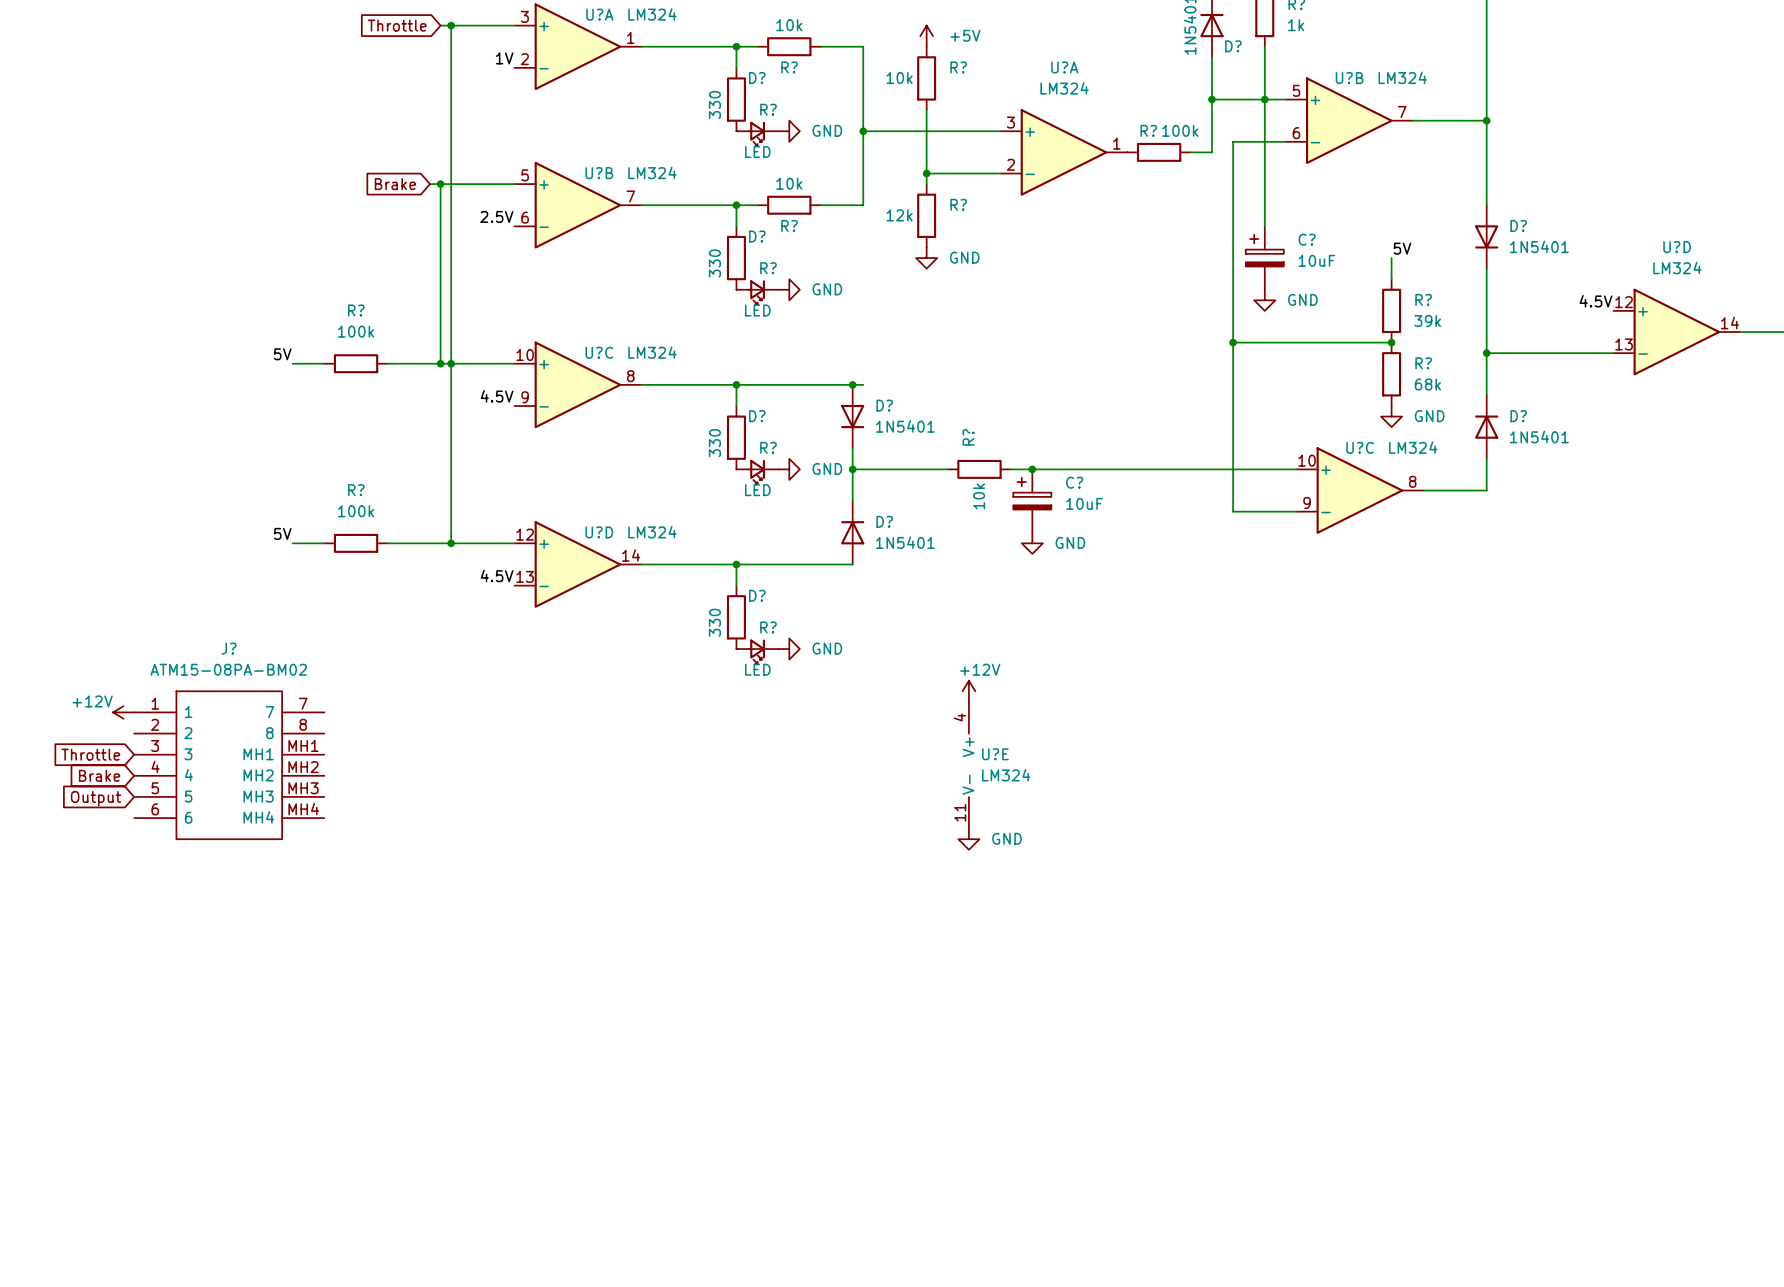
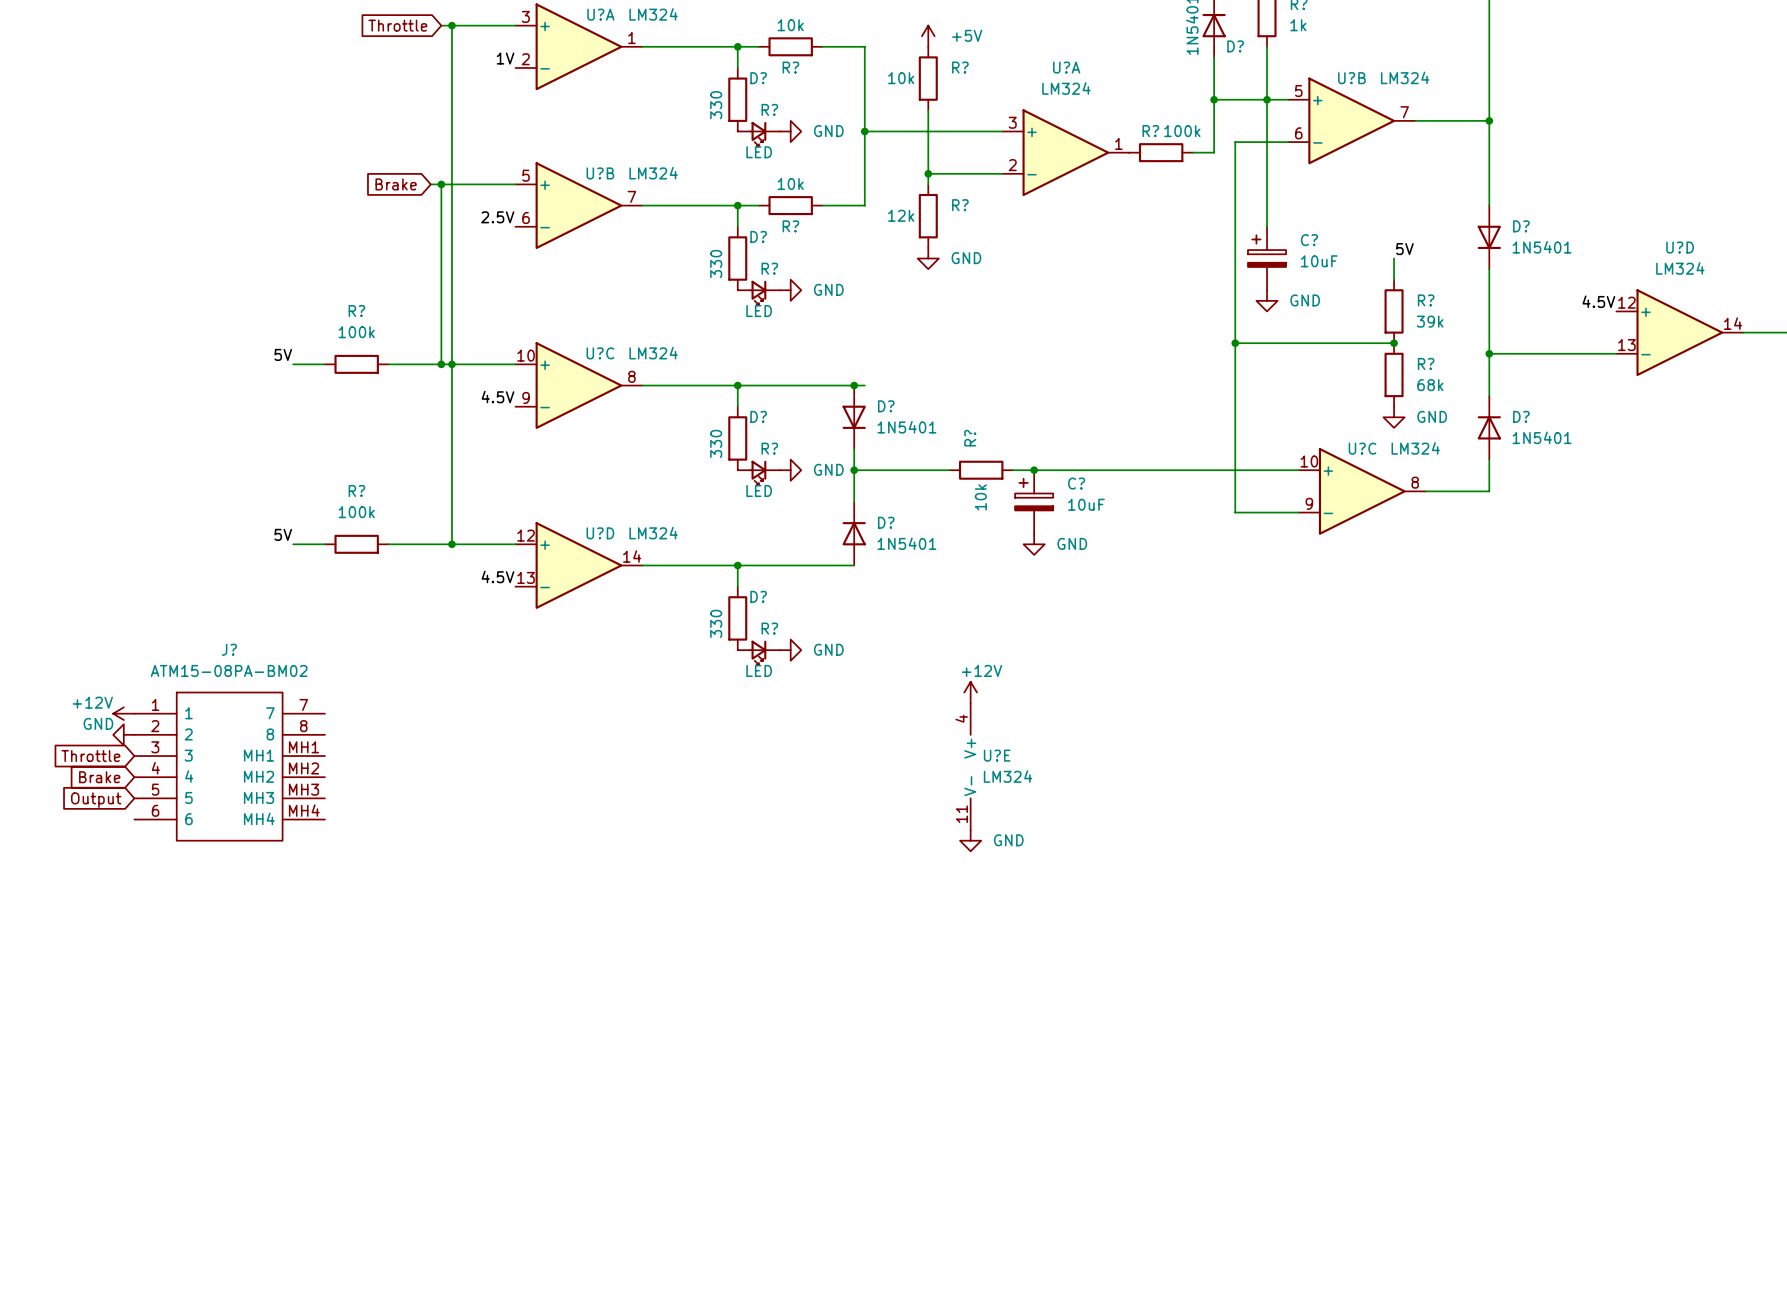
power symbol: none -> GND (123, 734)

